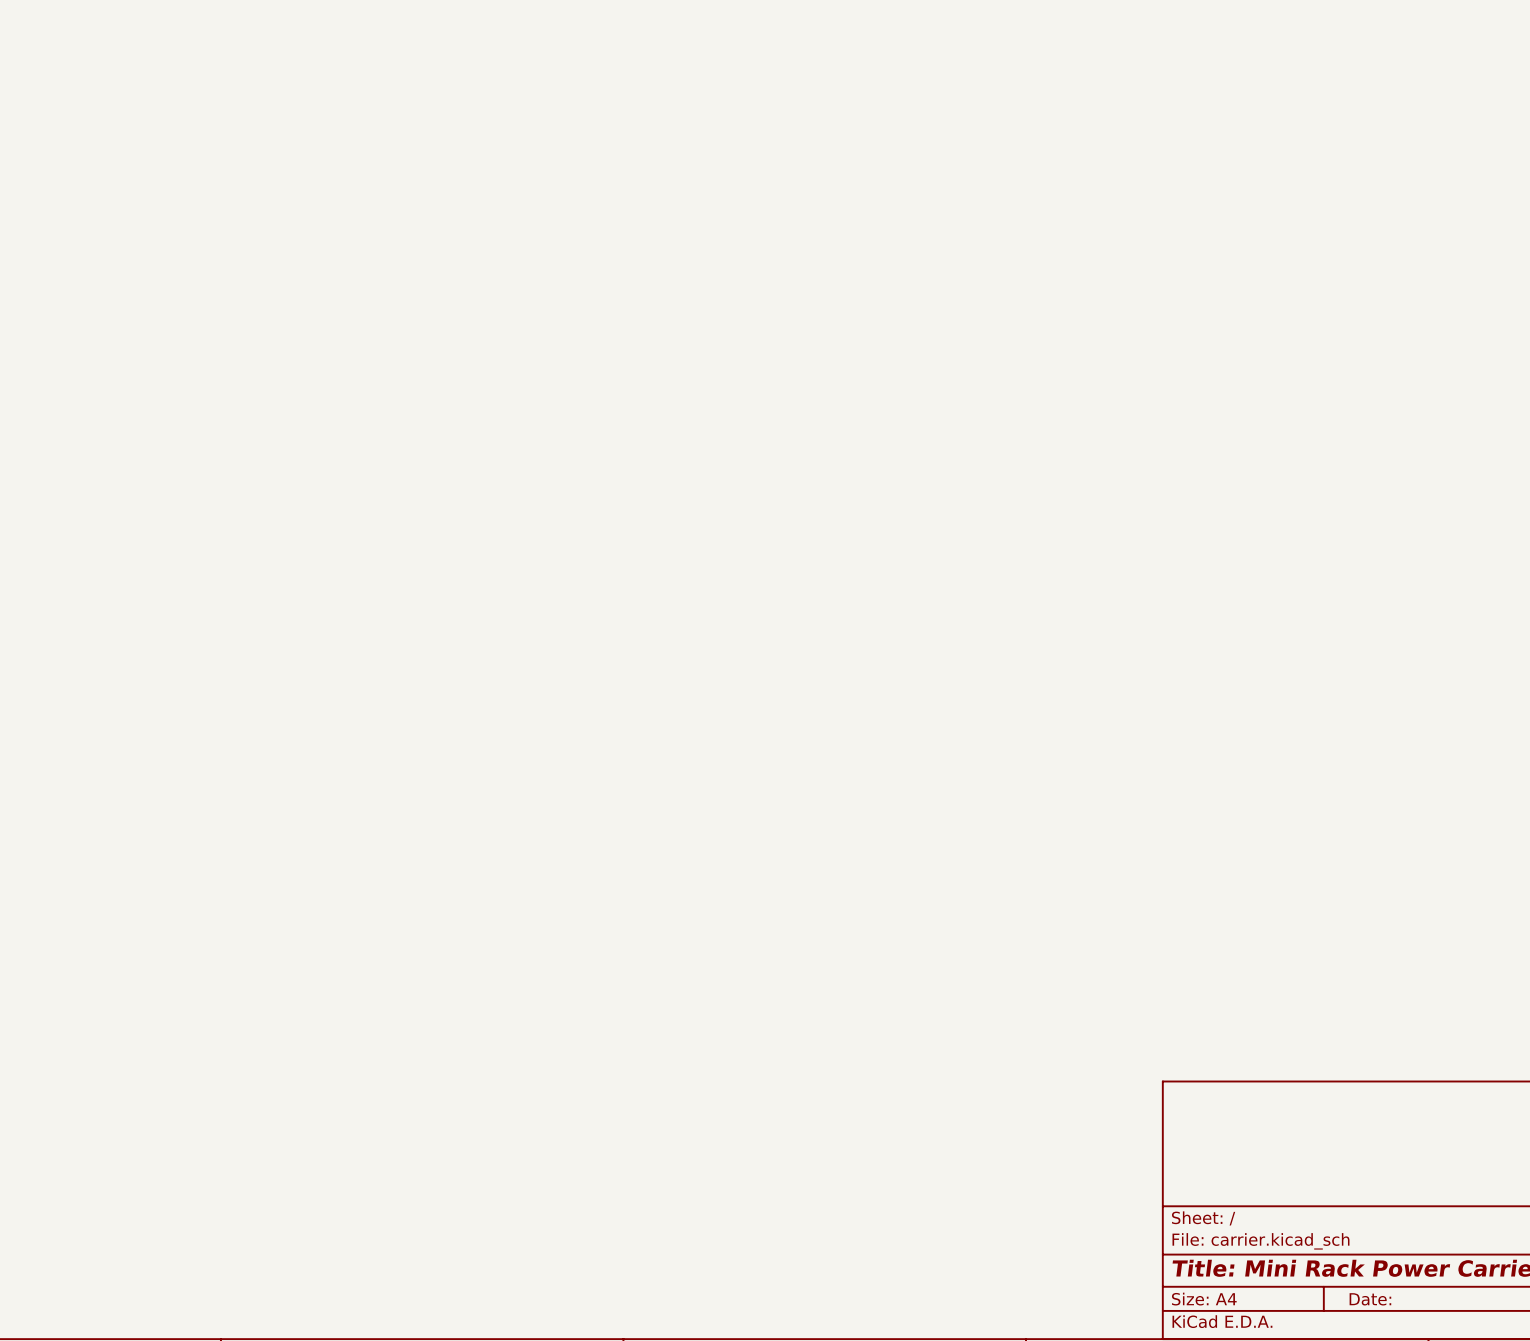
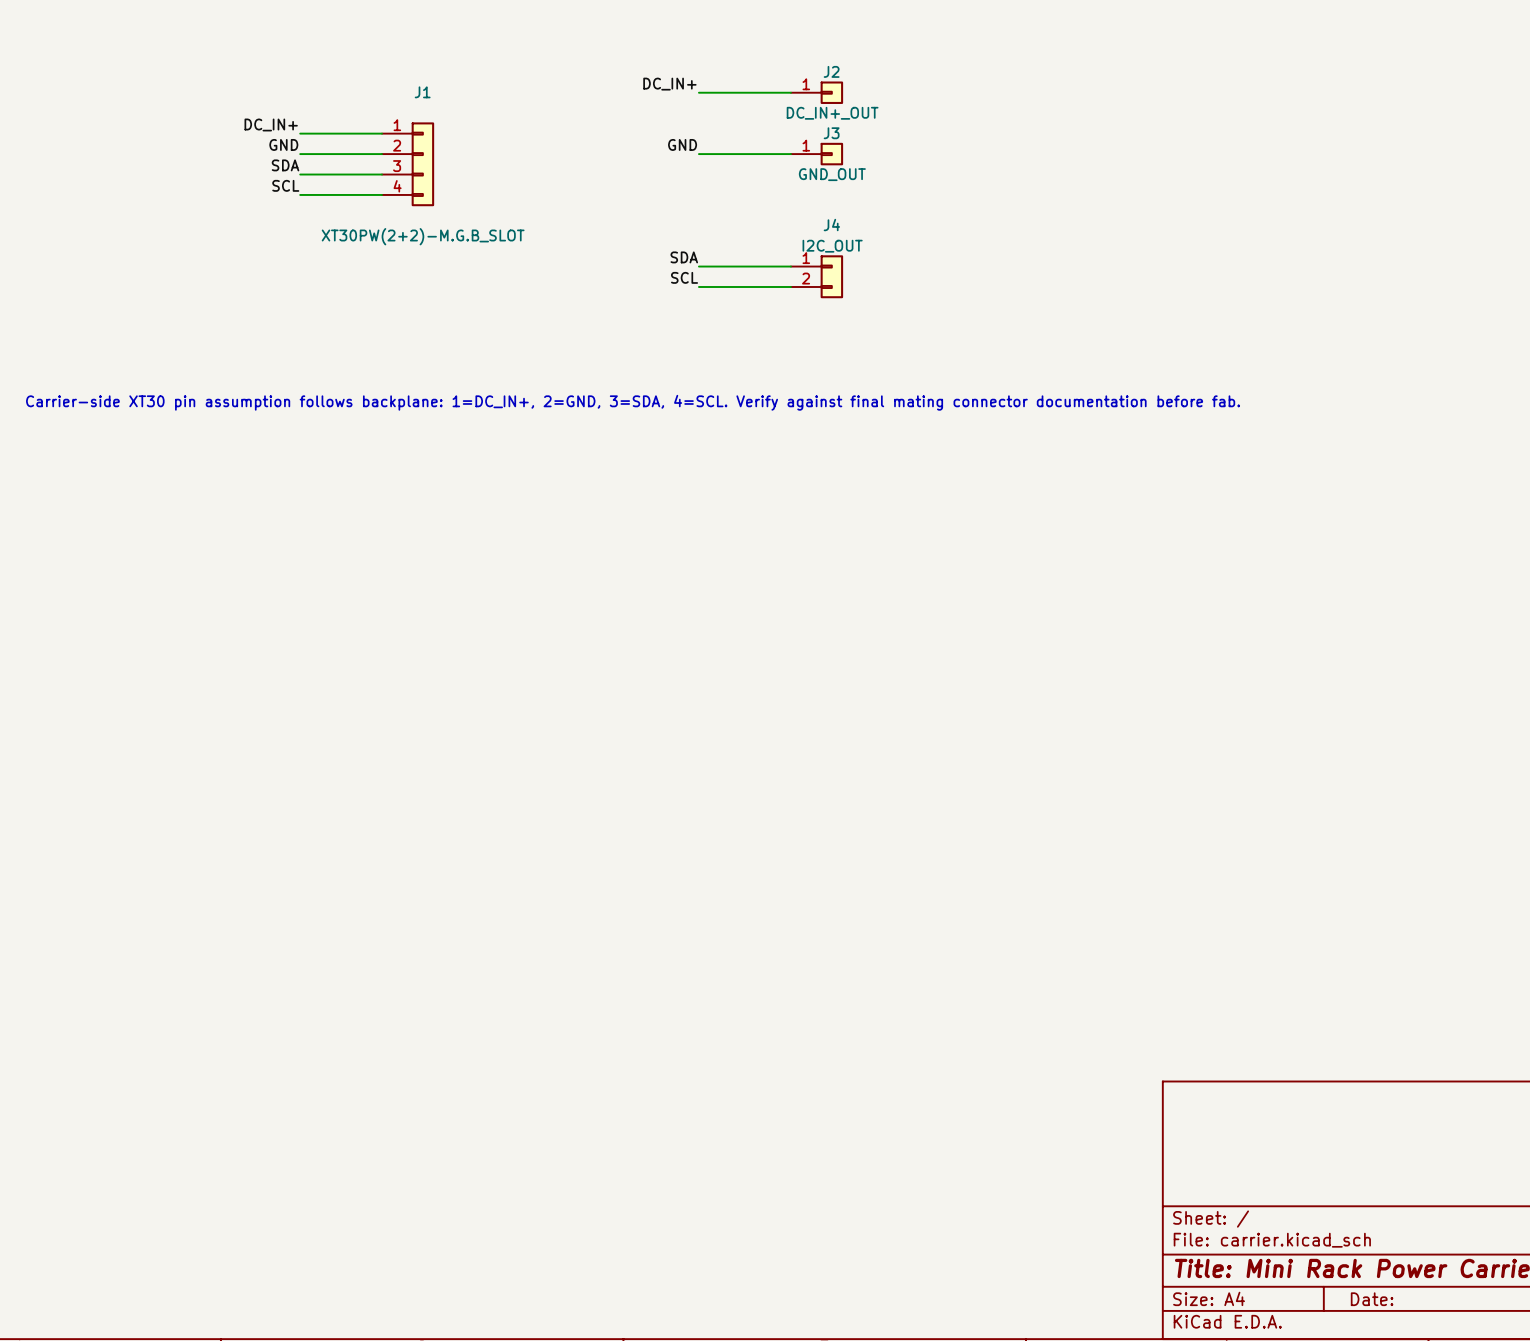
label: none -> DC_IN+ (669, 84)
wire: none -> (698, 92) (790, 92)
J2: none -> DC_IN+_OUT (817, 92)
label: none -> DC_IN+ (271, 124)
wire: none -> (300, 133) (382, 133)
label: none -> GND (283, 144)
label: none -> GND (682, 144)
wire: none -> (300, 154) (382, 154)
wire: none -> (698, 154) (790, 154)
J3: none -> GND_OUT (817, 154)
J1: none -> XT30PW(2+2)-M.G.B_SLOT (408, 164)
label: none -> SDA (285, 165)
wire: none -> (300, 174) (382, 174)
label: none -> SCL (285, 185)
wire: none -> (300, 194) (382, 194)
label: none -> SDA (684, 257)
wire: none -> (698, 266) (790, 266)
J4: none -> I2C_OUT (817, 276)
label: none -> SCL (684, 277)
wire: none -> (698, 286) (790, 286)
text: none -> Carrier-side XT30 pin assumption follows backplane: 1=DC_IN+, 2=GND, 3=SDA, 4=SCL. Verify against final mating connector documentation before fab. (633, 402)

